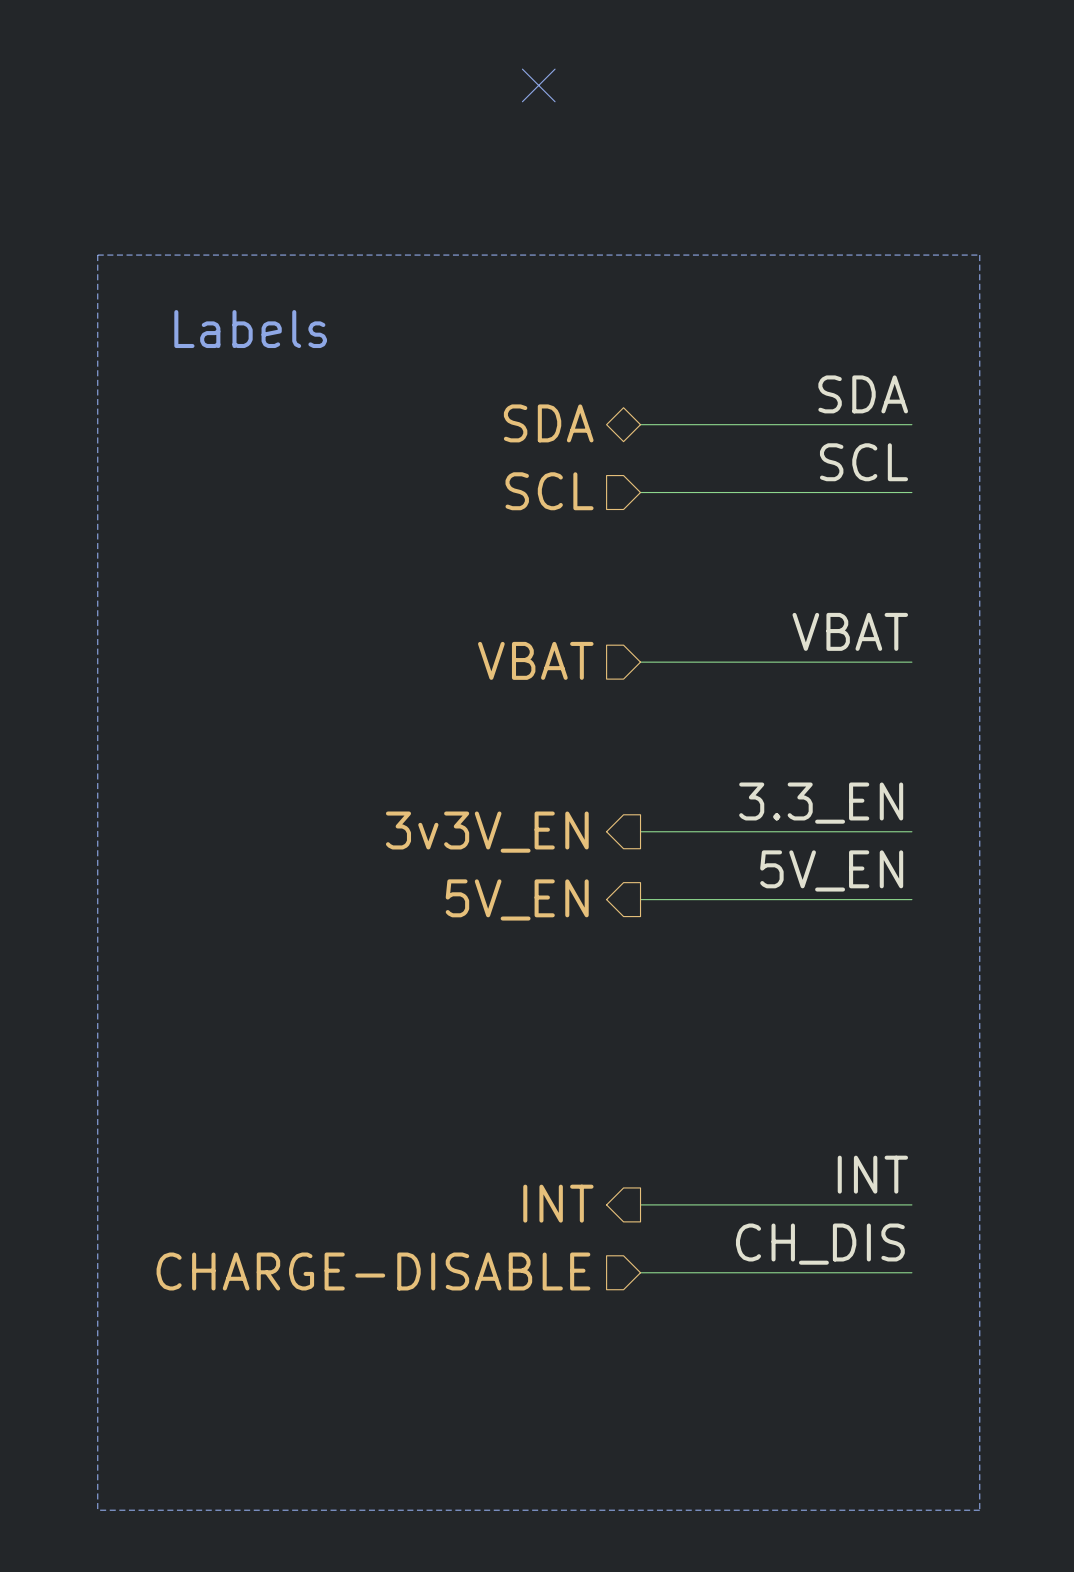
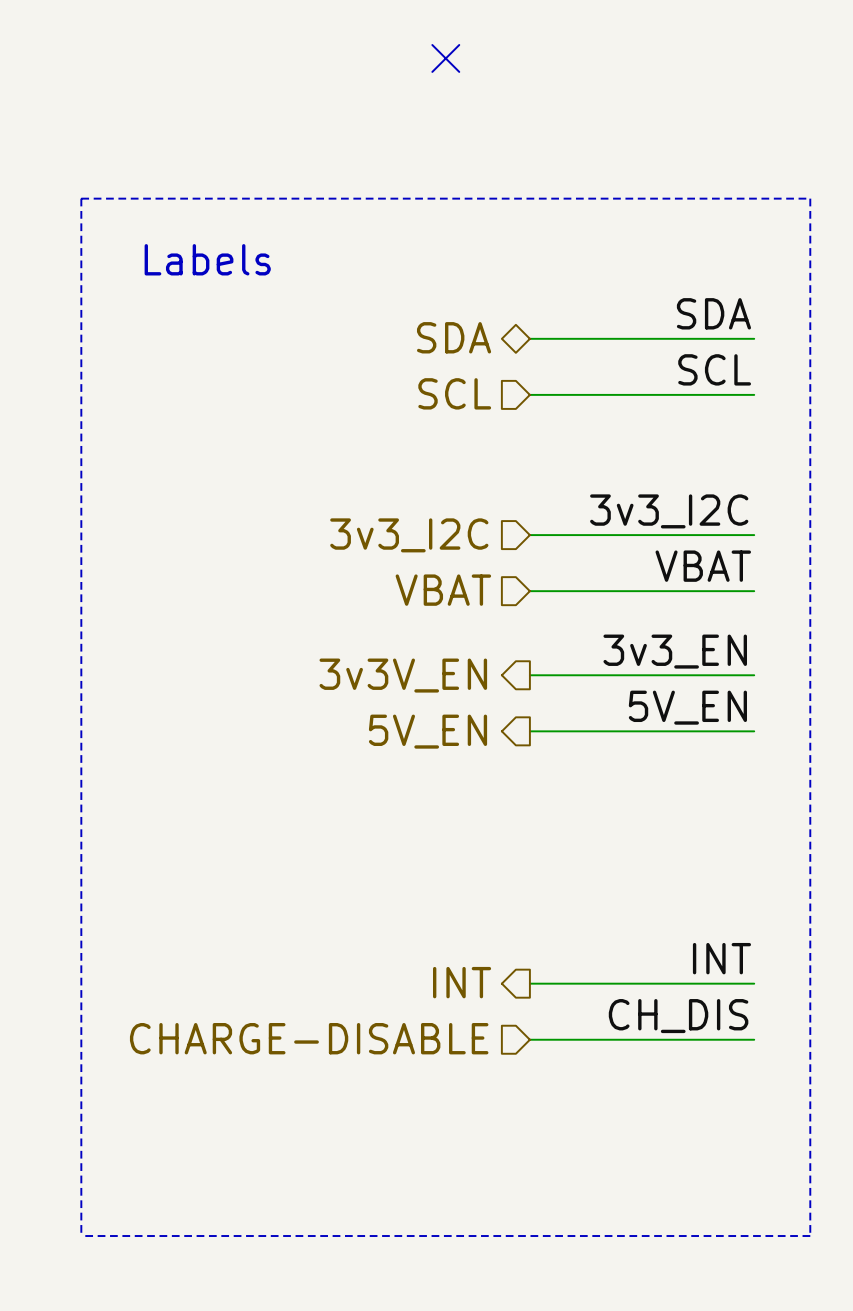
label: VBAT (850, 631) -> 3v3_I2C (669, 511)
hierarchical label: VBAT (535, 660) -> 3v3_I2C (409, 535)
label: none -> VBAT (703, 566)
hierarchical label: none -> VBAT (443, 590)
wire: none -> (529, 591) (754, 591)
label: 3.3_EN (821, 803) -> 3v3_EN (675, 651)

